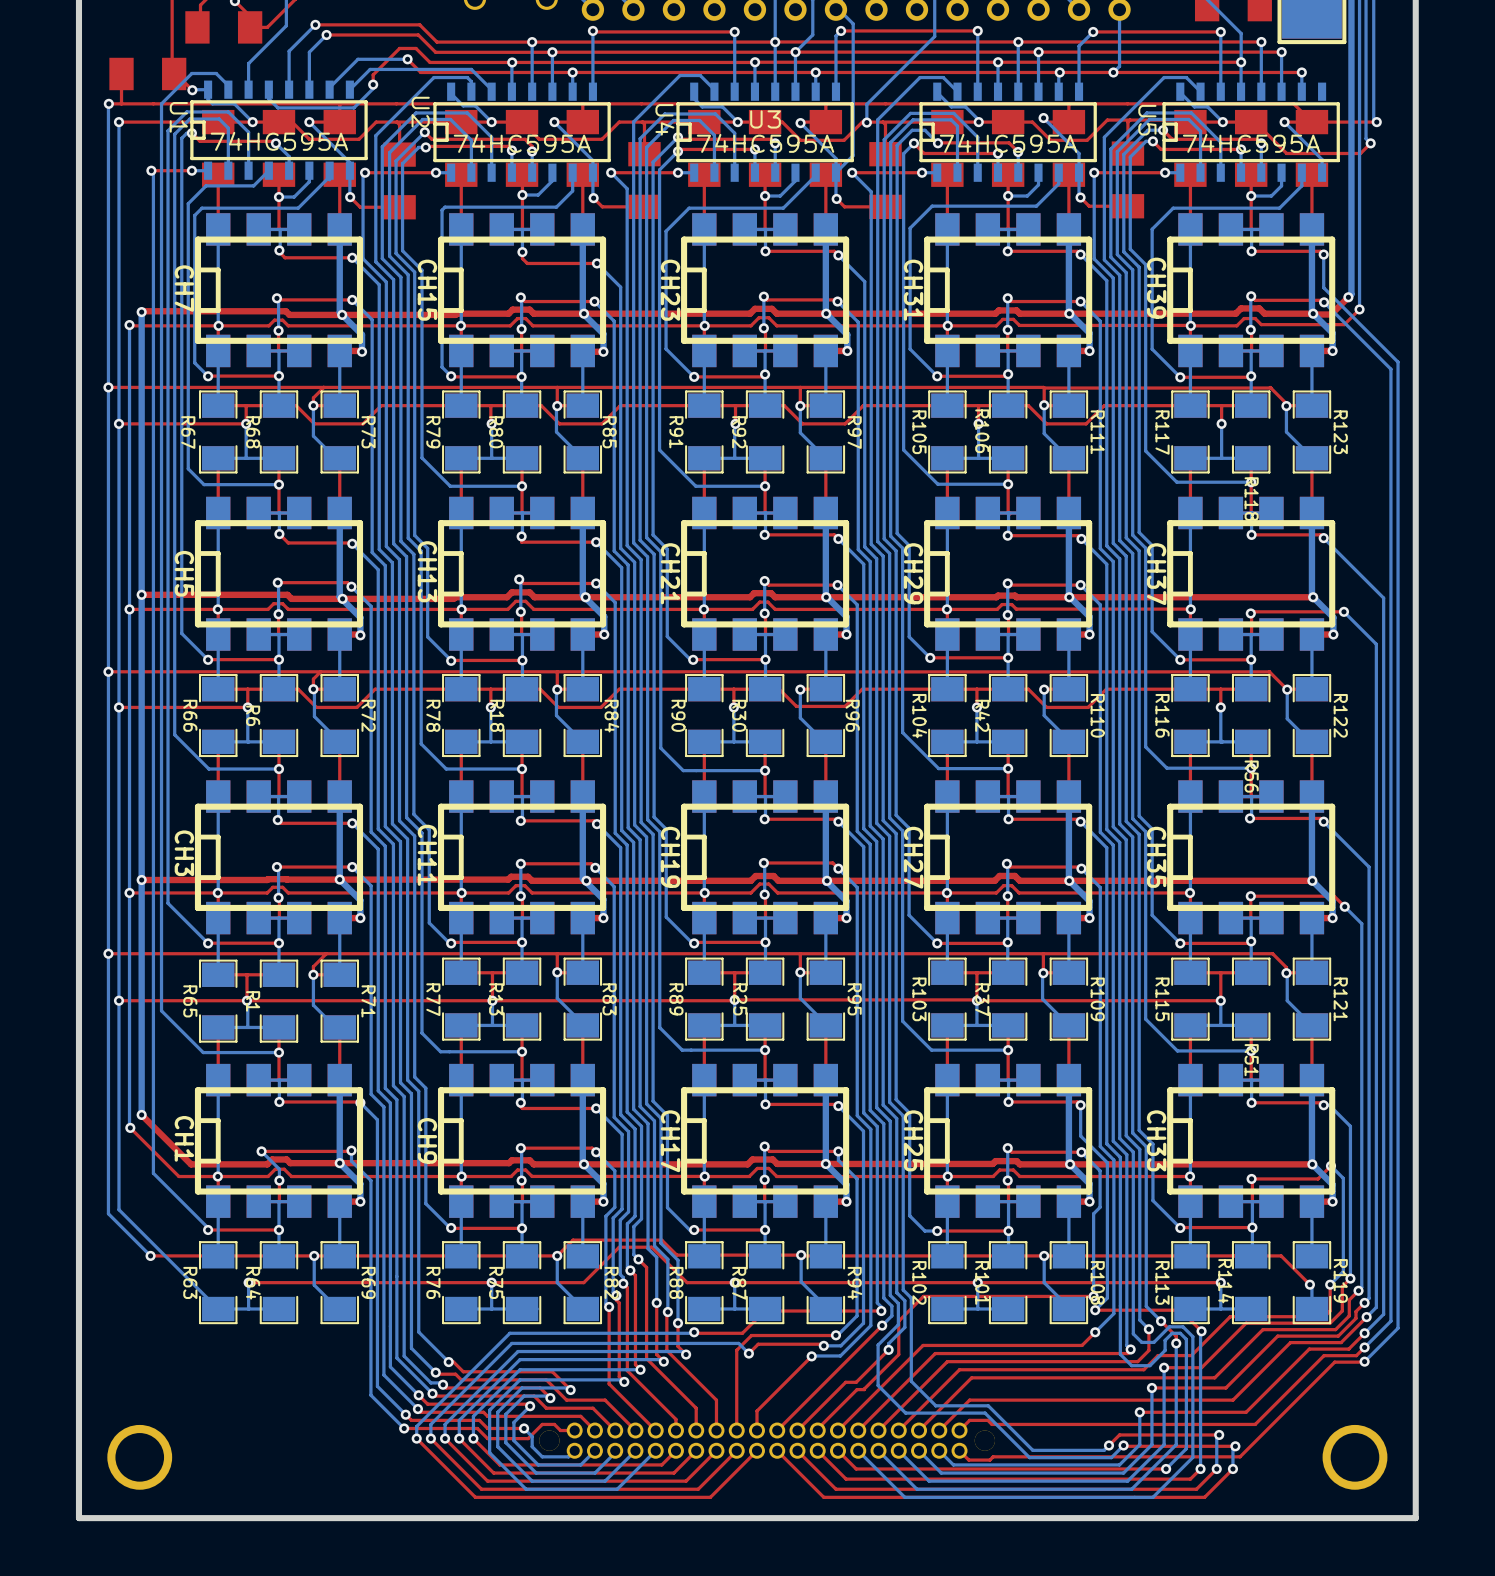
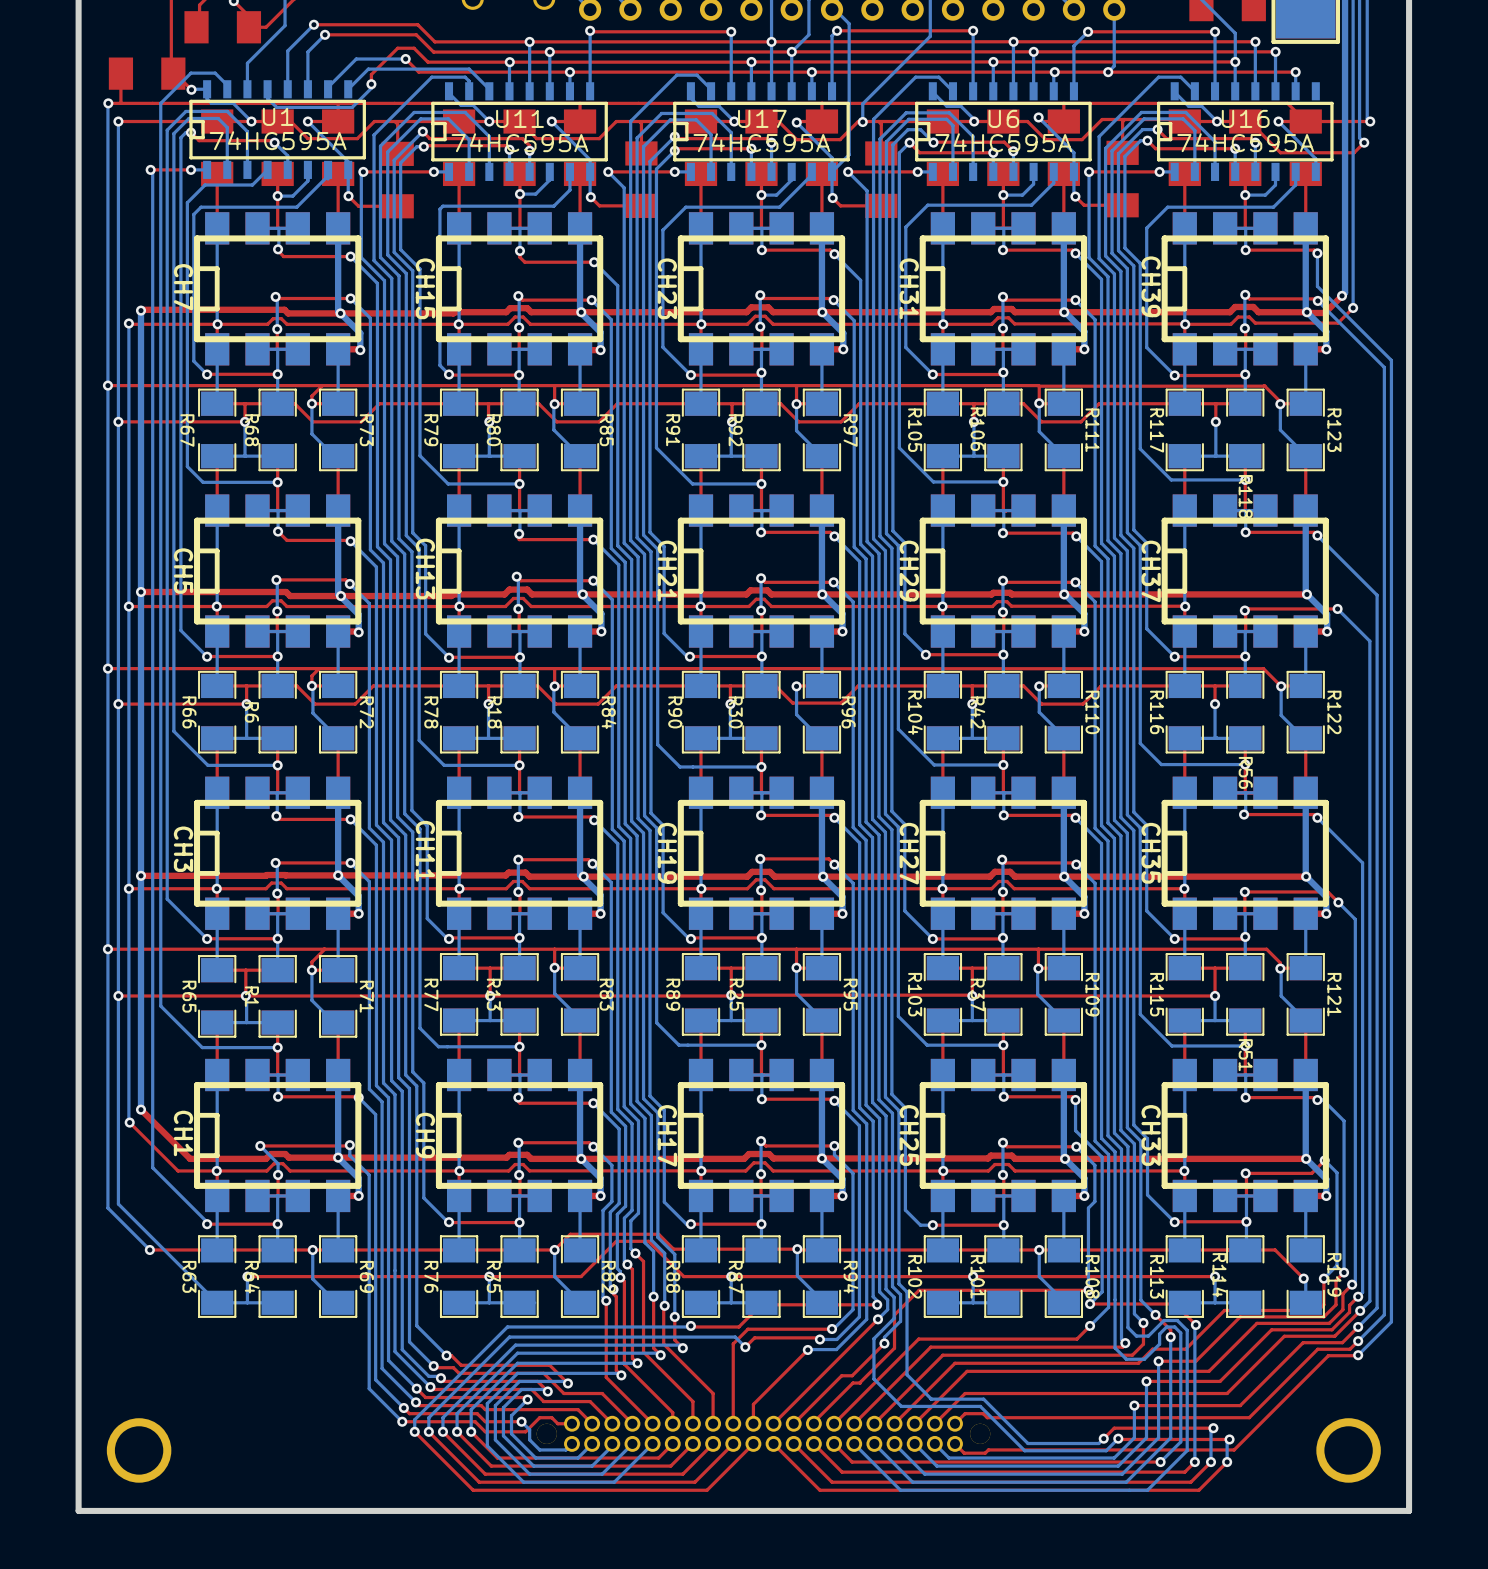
U2 name: U2 (420, 112) -> U11 (520, 118)
U1 name rotation: 0° (178, 117) -> 90° counterclockwise (278, 116)
U1 name position: U1 (178, 117) -> U1 (278, 116)
U4 name: U4 (664, 119) -> U6 (1003, 118)
U3 name: U3 (765, 119) -> U17 (762, 118)
U5 name: U5 (1147, 120) -> U16 (1245, 118)

